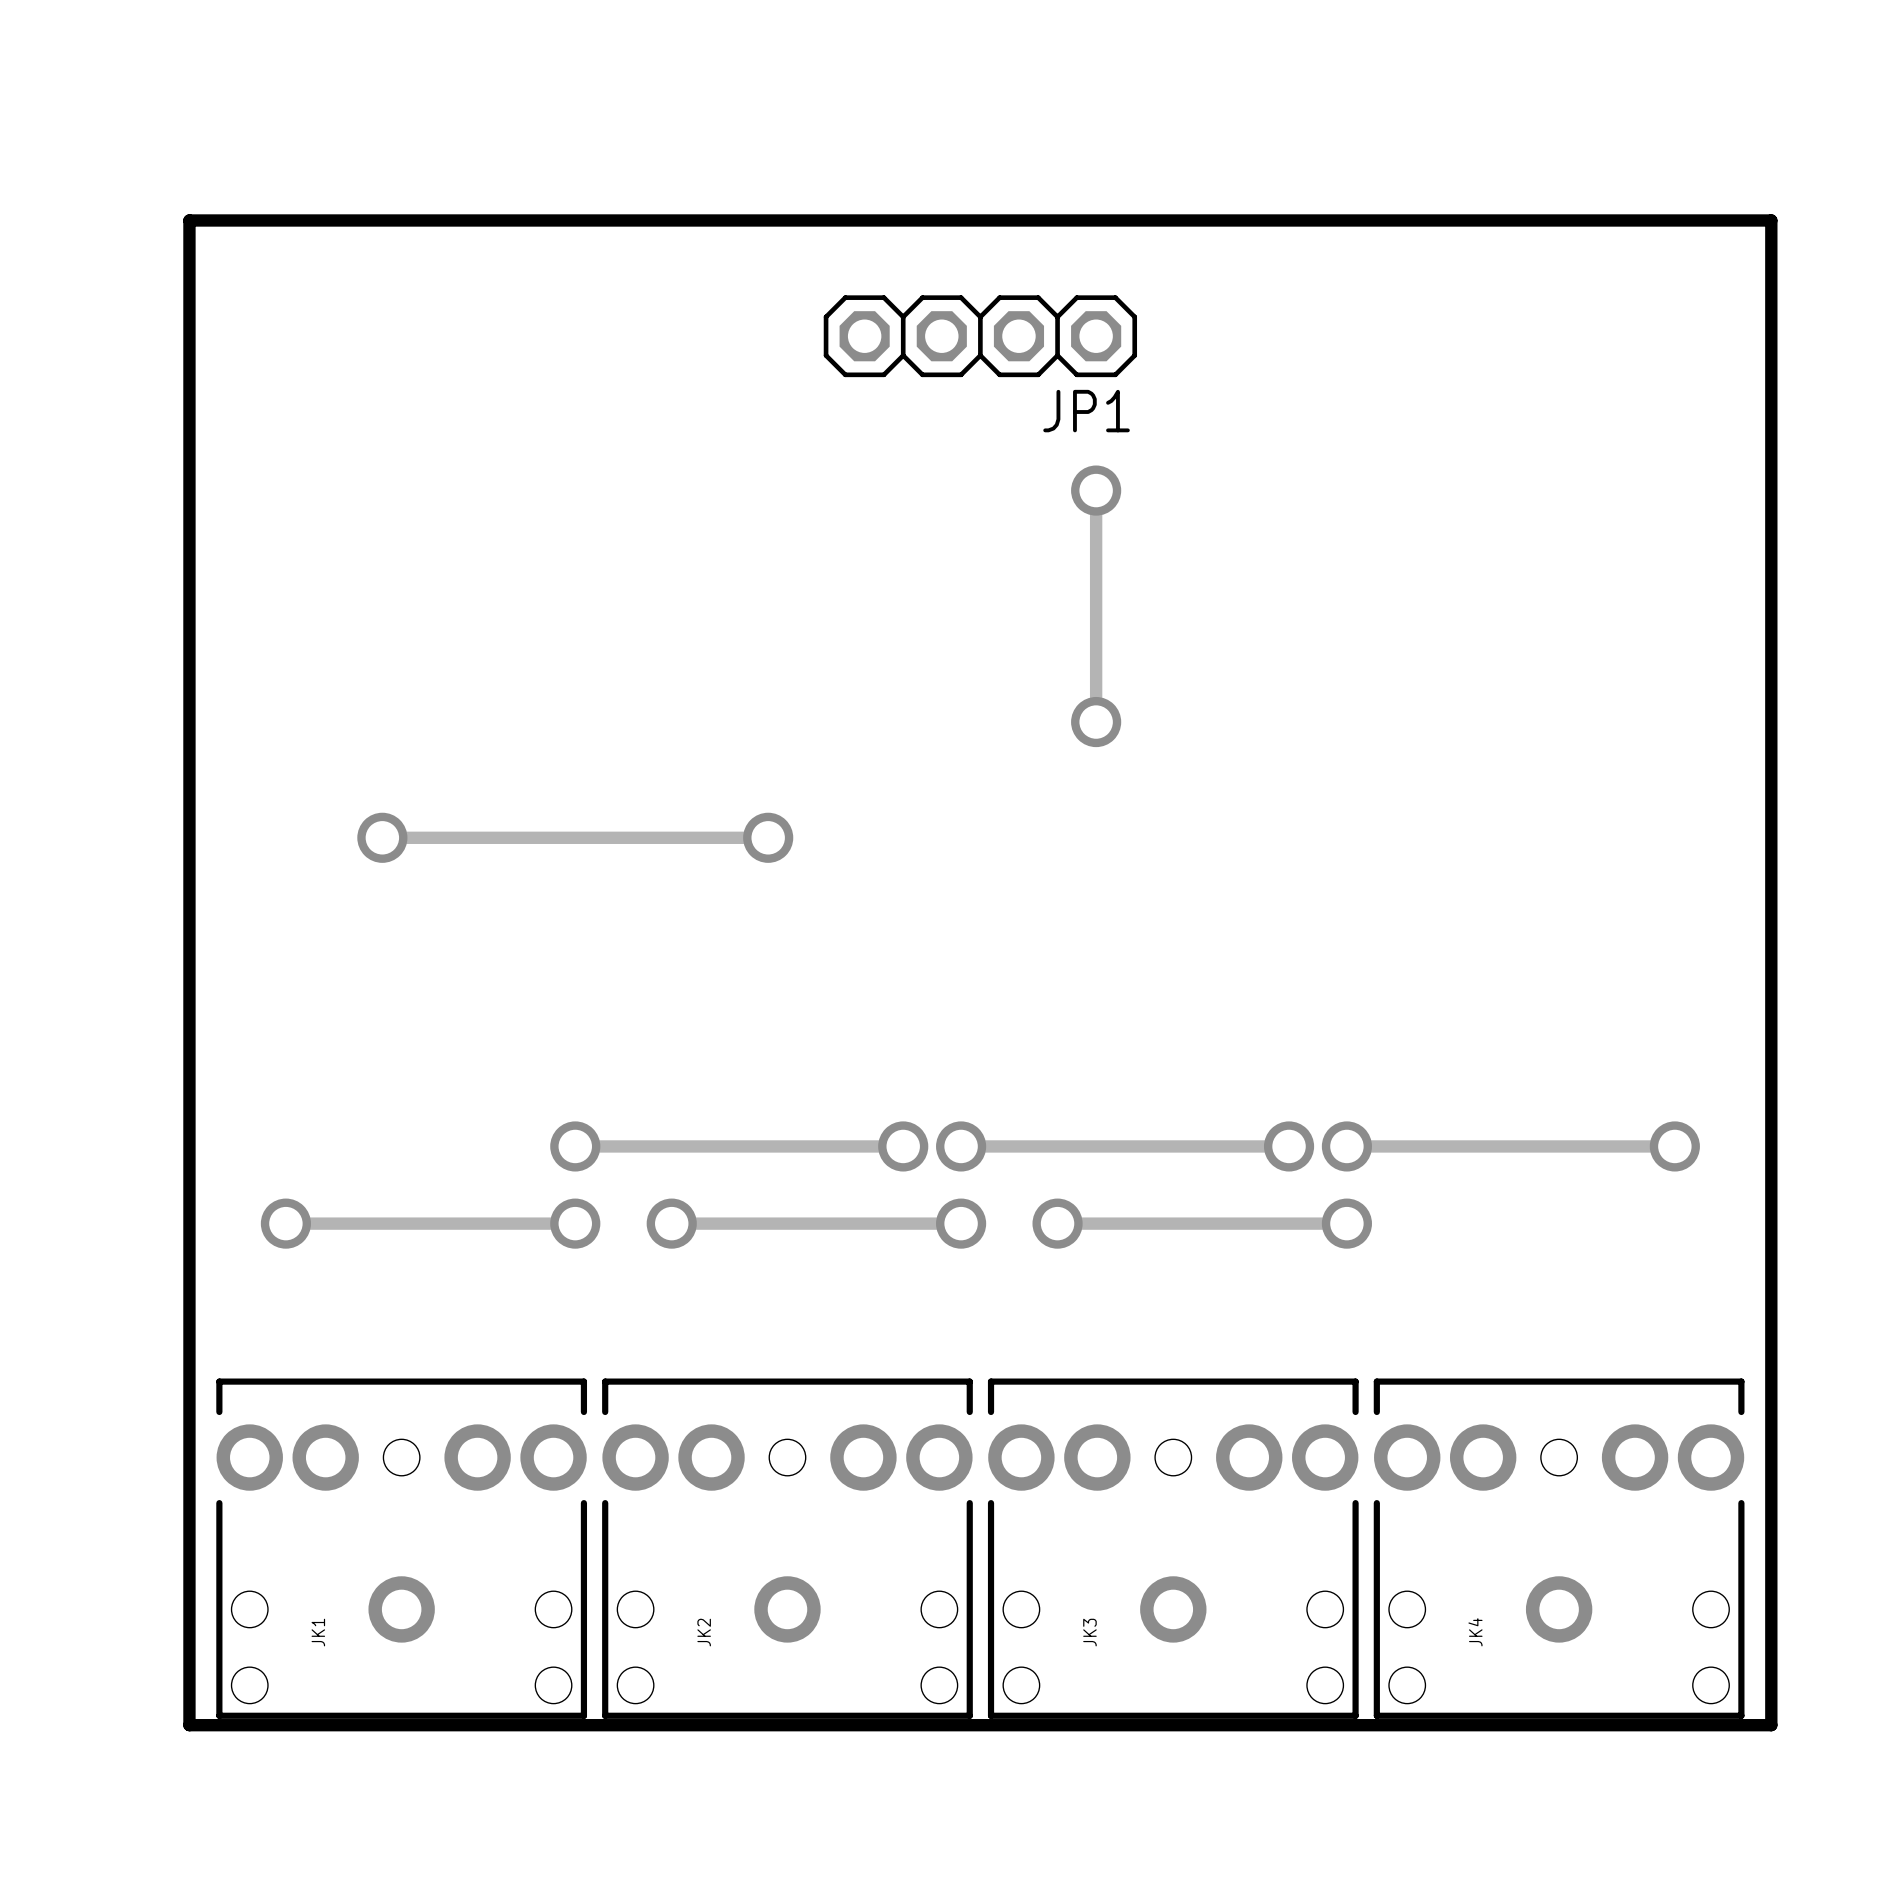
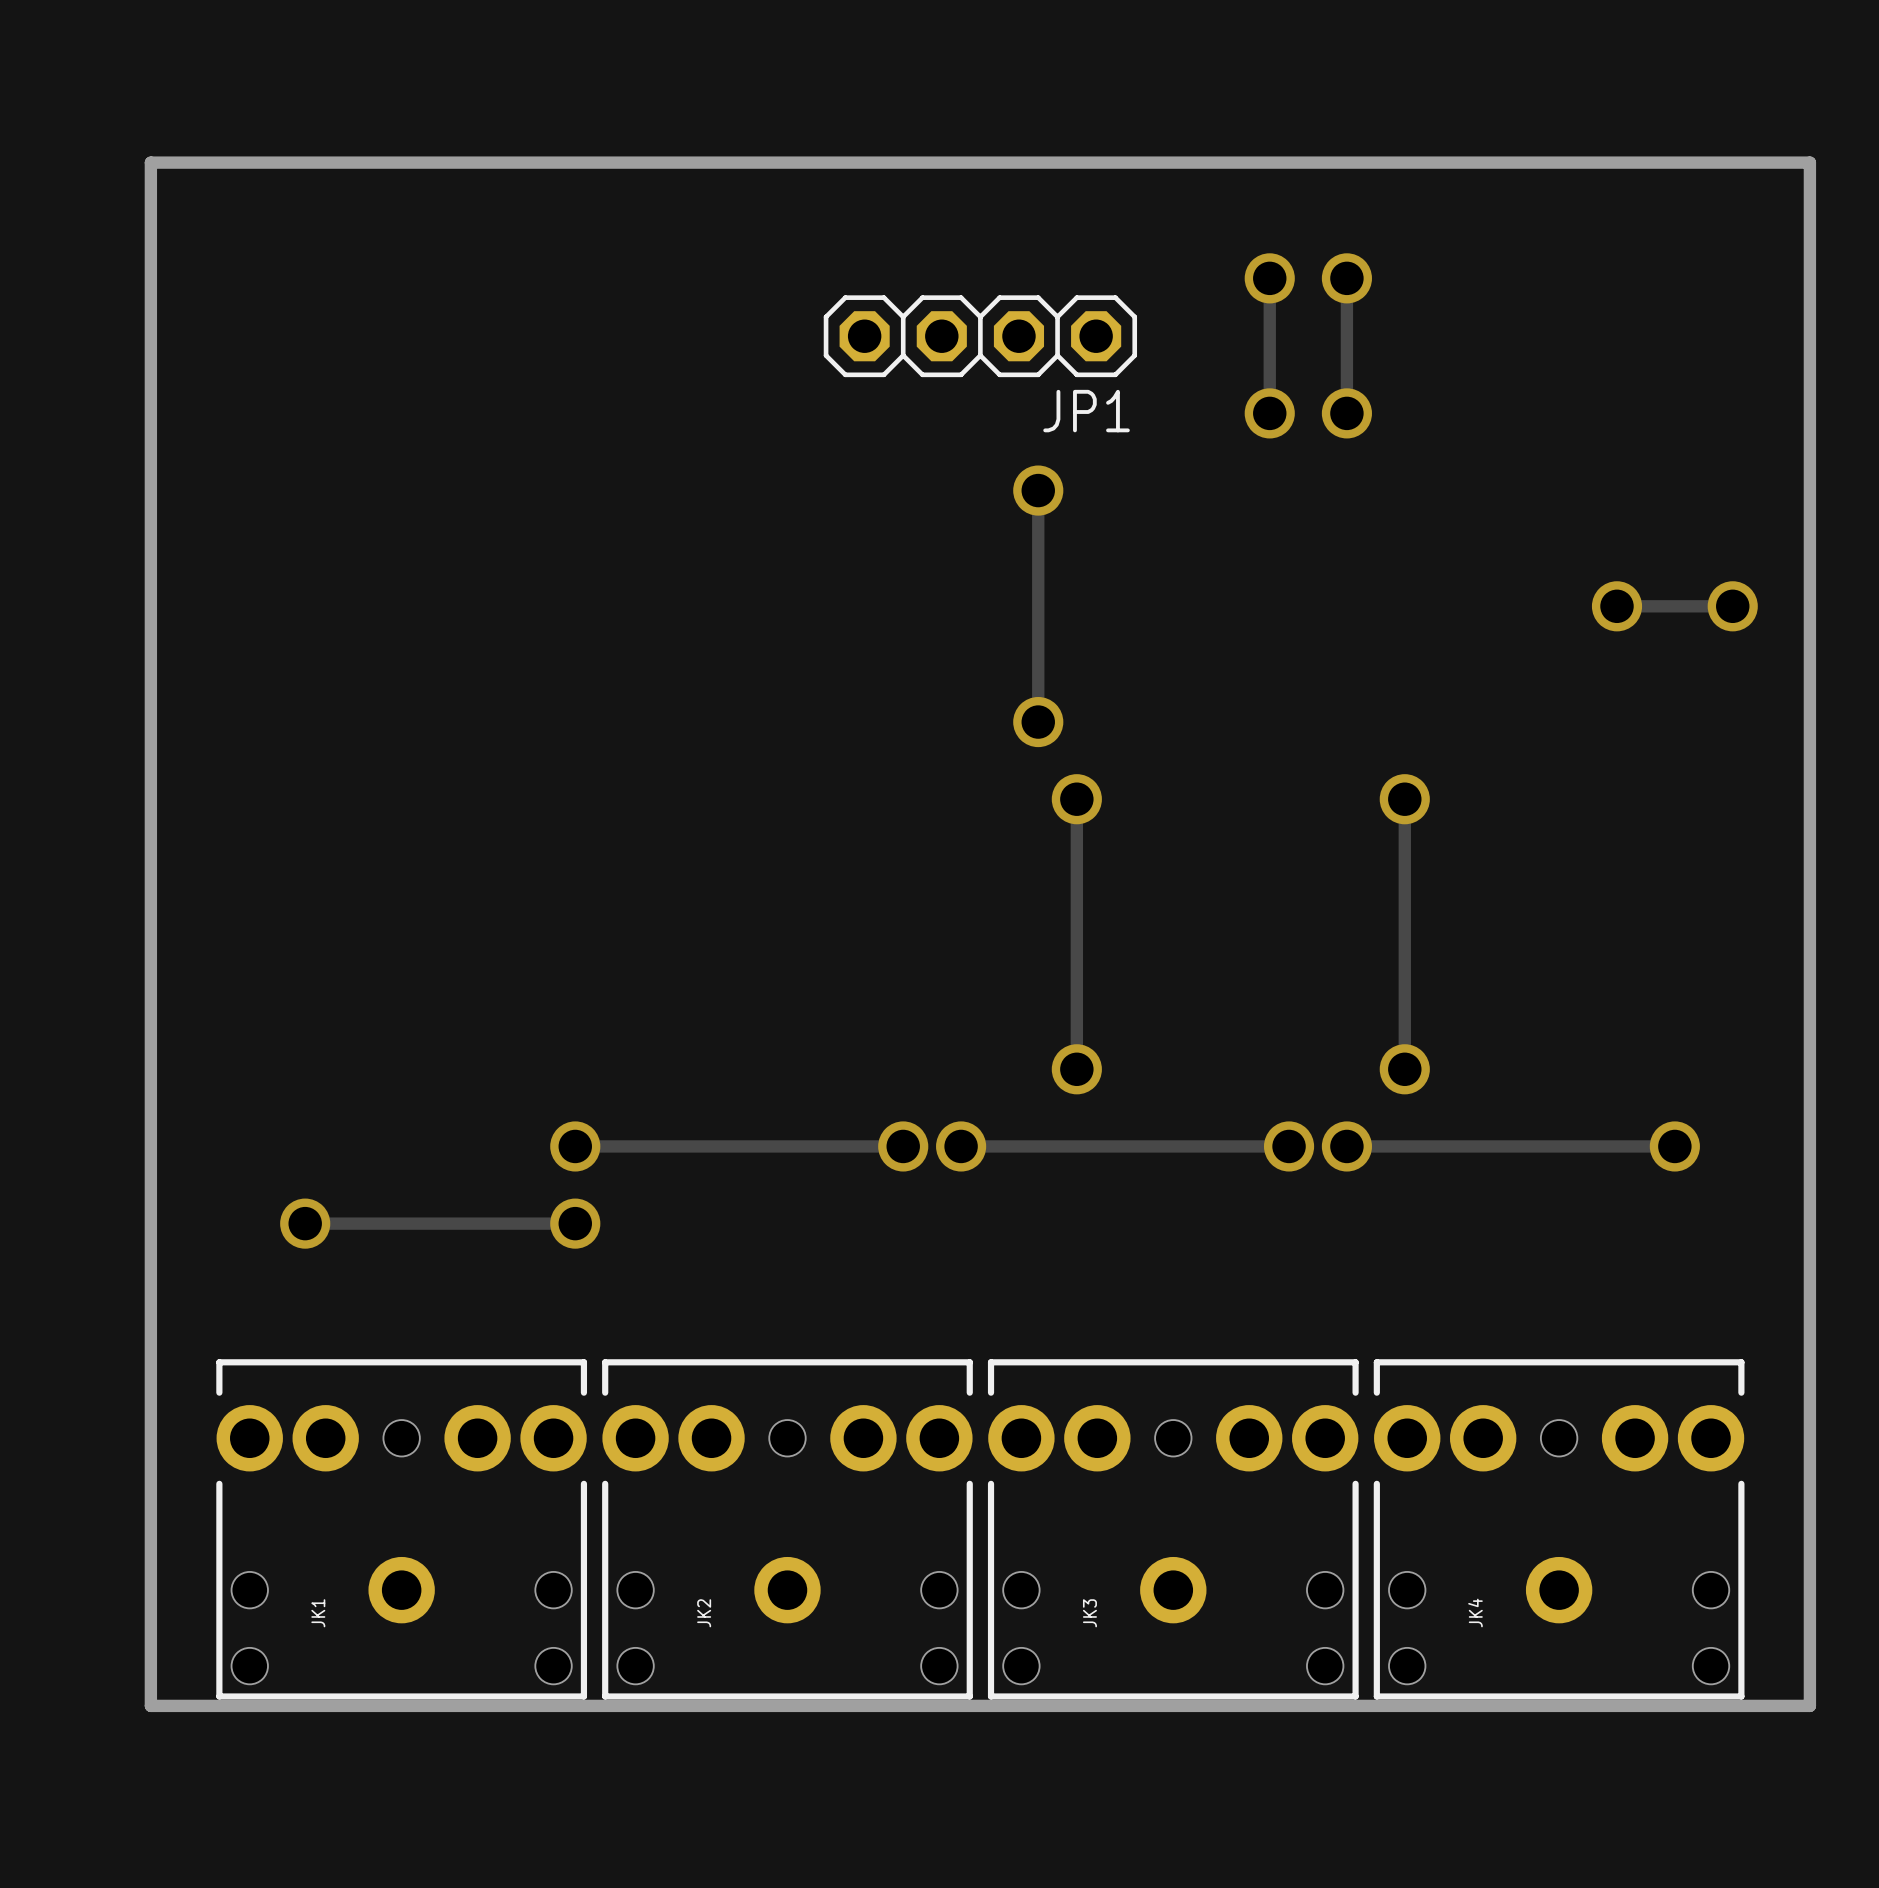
board edge: (189, 220) (1771, 220) (1771, 1725) (189, 1725) (189, 220) -> (150, 162) (150, 1705) (1809, 1705) (1809, 162) (150, 162)
track: none -> (1269, 278) (1269, 413)
via: none -> (1269, 278)
track: none -> (1346, 278) (1346, 413)
via: none -> (1346, 278)
via: none -> (1269, 413)
via: none -> (1346, 413)
track: (1096, 490) (1096, 722) -> (1038, 490) (1038, 722)
via position: (1096, 490) -> (1038, 490)
track: none -> (1616, 606) (1732, 606)
via: none -> (1616, 606)
via: none -> (1732, 606)
via: none -> (1038, 722)
via: (1096, 722) -> none
track: none -> (1076, 799) (1076, 1069)
via: none -> (1076, 799)
track: none -> (1404, 799) (1404, 1069)
via: none -> (1404, 799)
track: (382, 837) (768, 837) -> none
via: (382, 837) -> none
via: (768, 837) -> none
via: none -> (1076, 1069)
via: none -> (1404, 1069)
via position: (285, 1223) -> (305, 1223)
track: (671, 1223) (961, 1223) -> none
via: (671, 1223) -> none
via: (961, 1223) -> none
track: (1057, 1223) (1346, 1223) -> none
via: (1057, 1223) -> none
via: (1346, 1223) -> none
JK1 position: (401, 1548) -> (401, 1529)
JK2 position: (787, 1548) -> (787, 1529)
JK3 position: (1173, 1548) -> (1173, 1529)
JK4 position: (1559, 1548) -> (1559, 1529)

